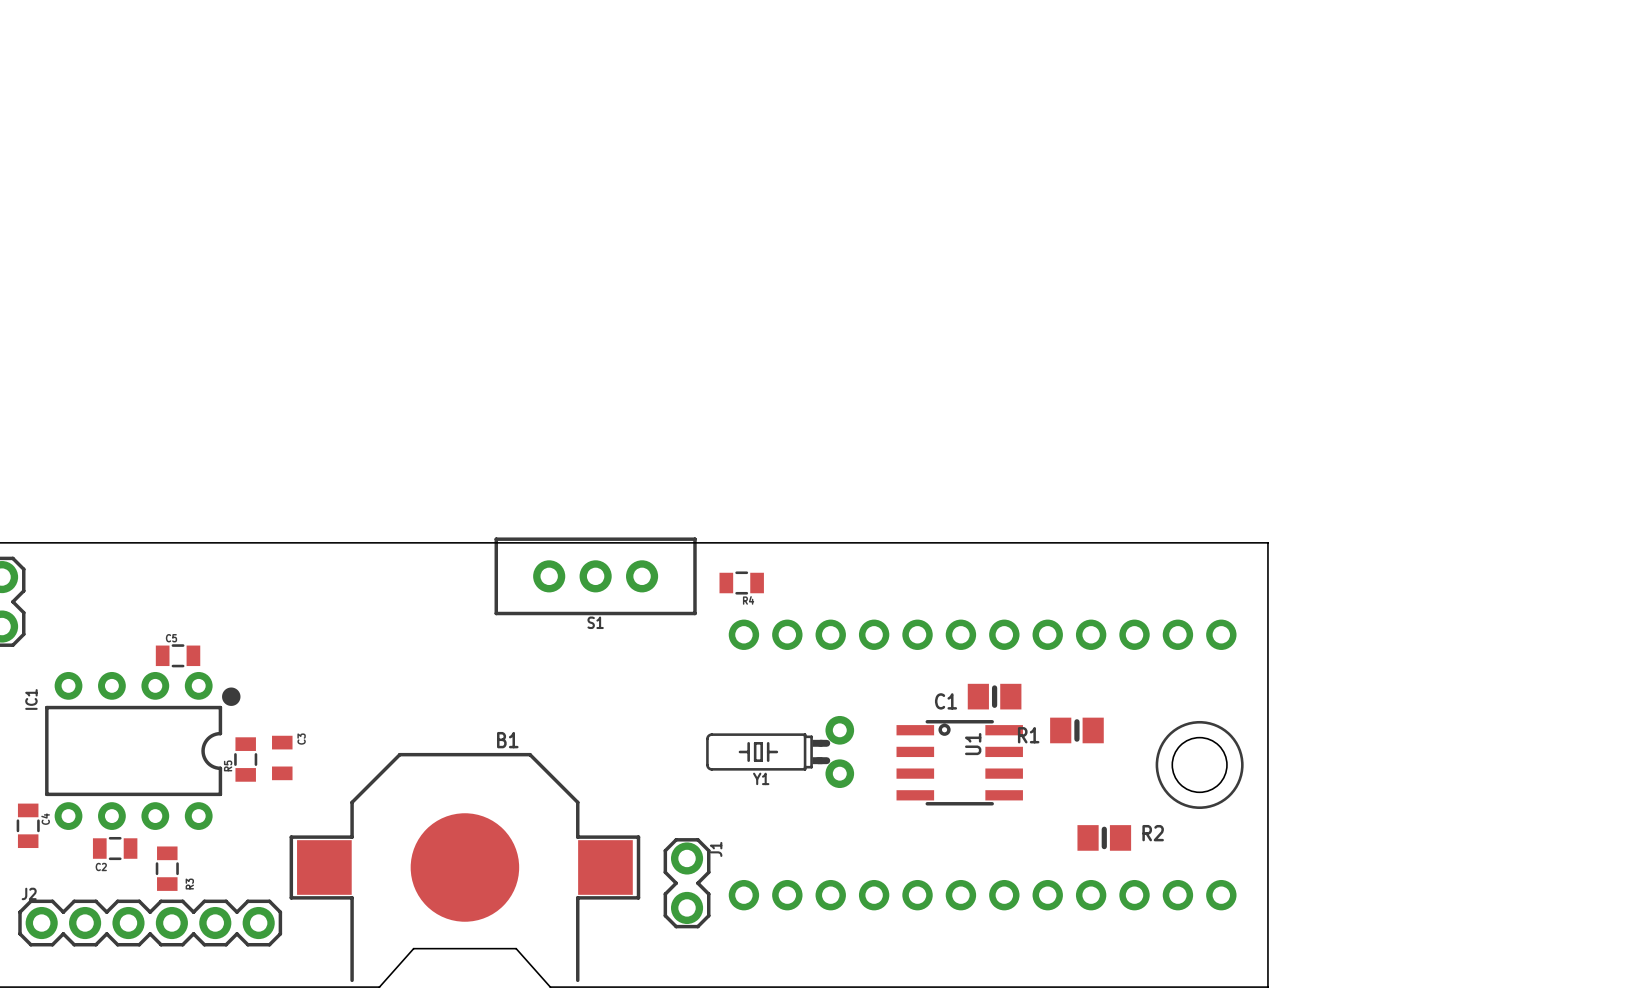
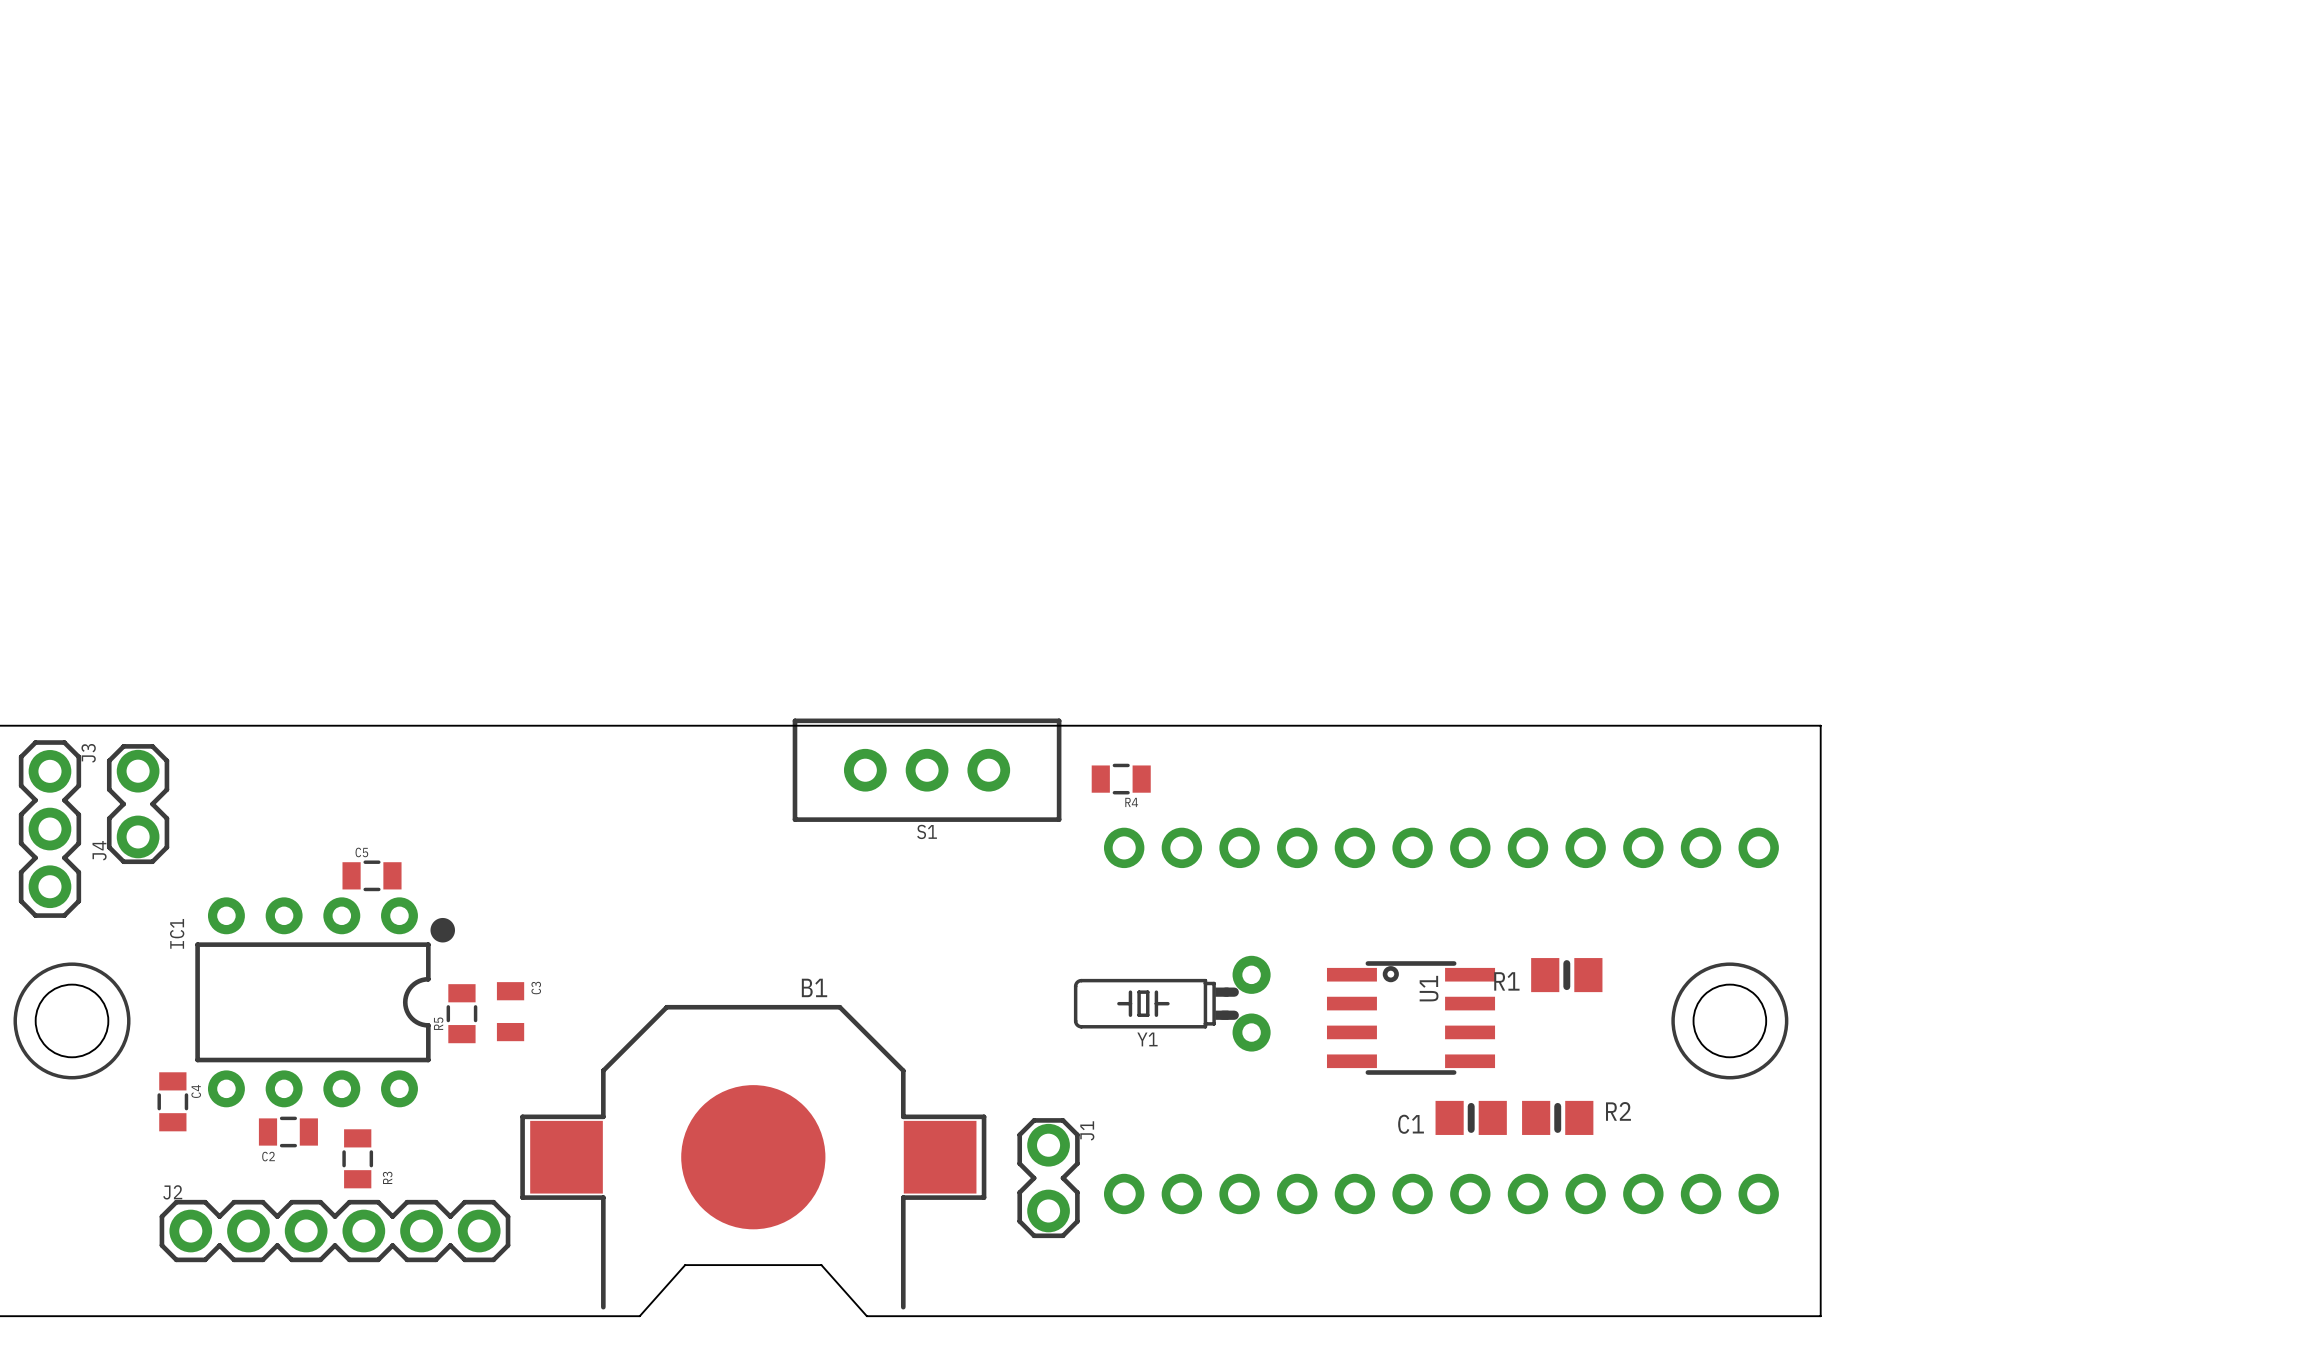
C1 position: (994, 696) -> (1471, 1117)
R2 position: (1104, 837) -> (1557, 1117)

